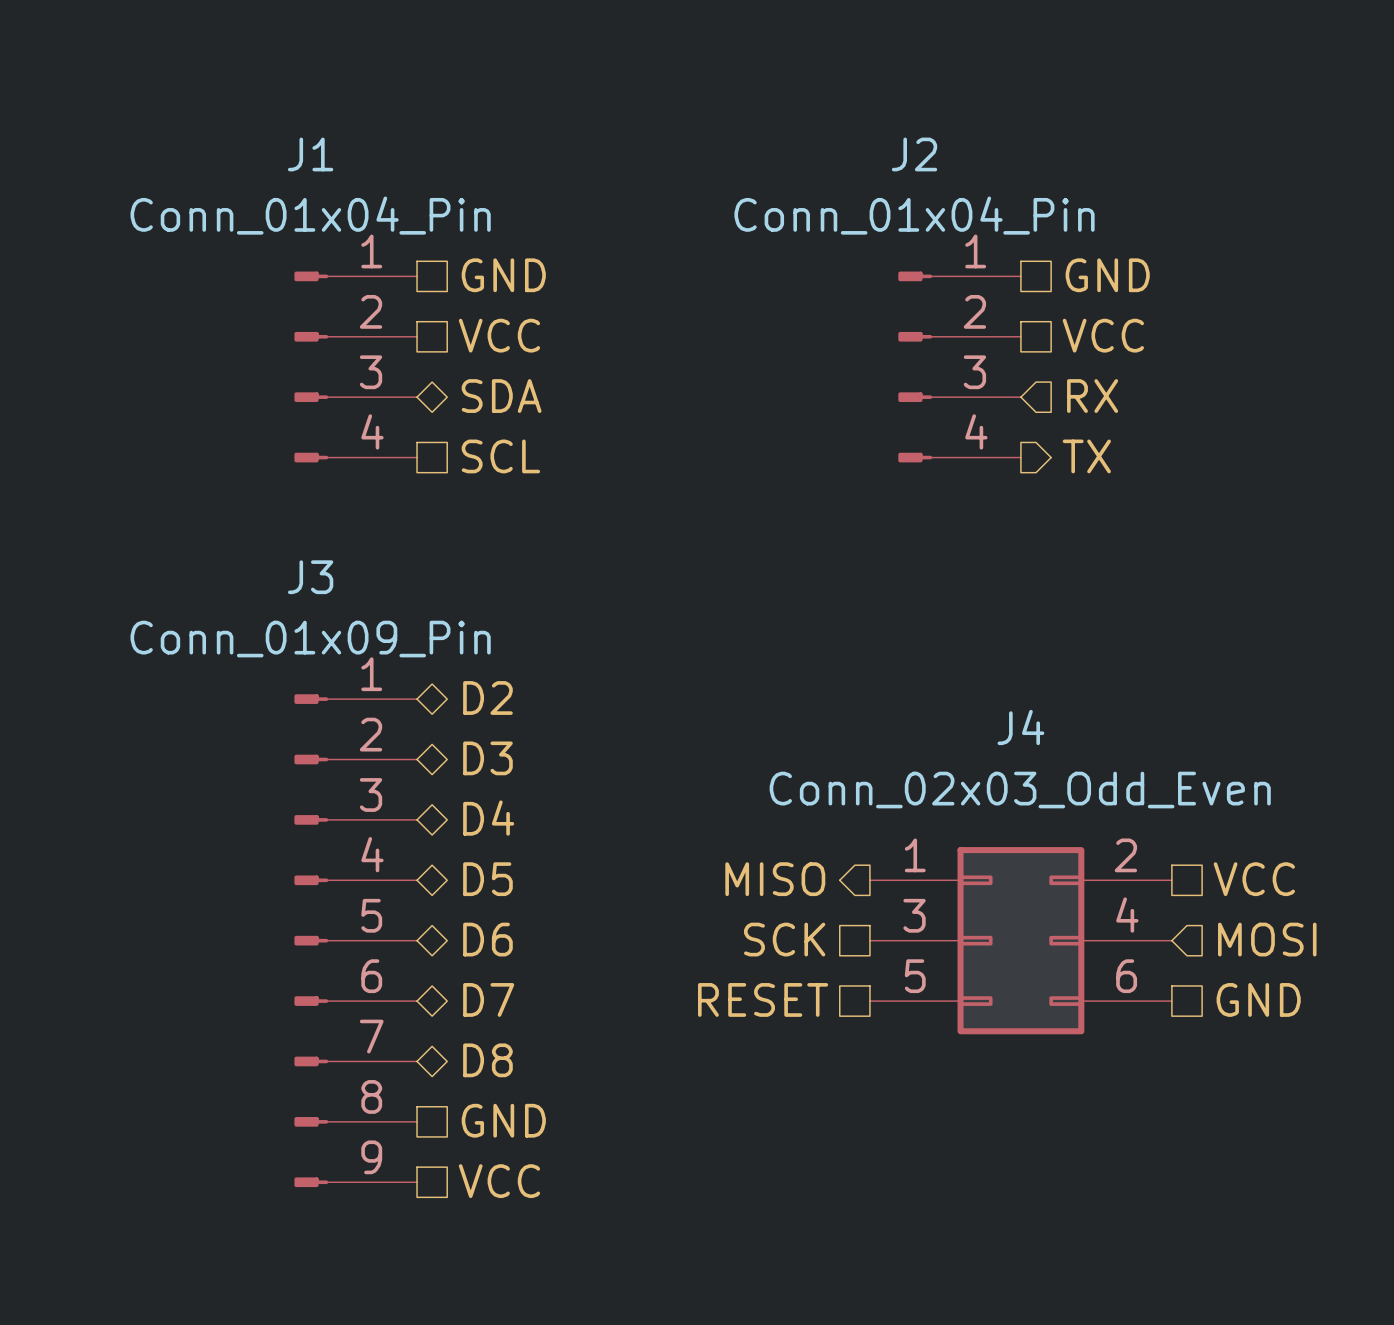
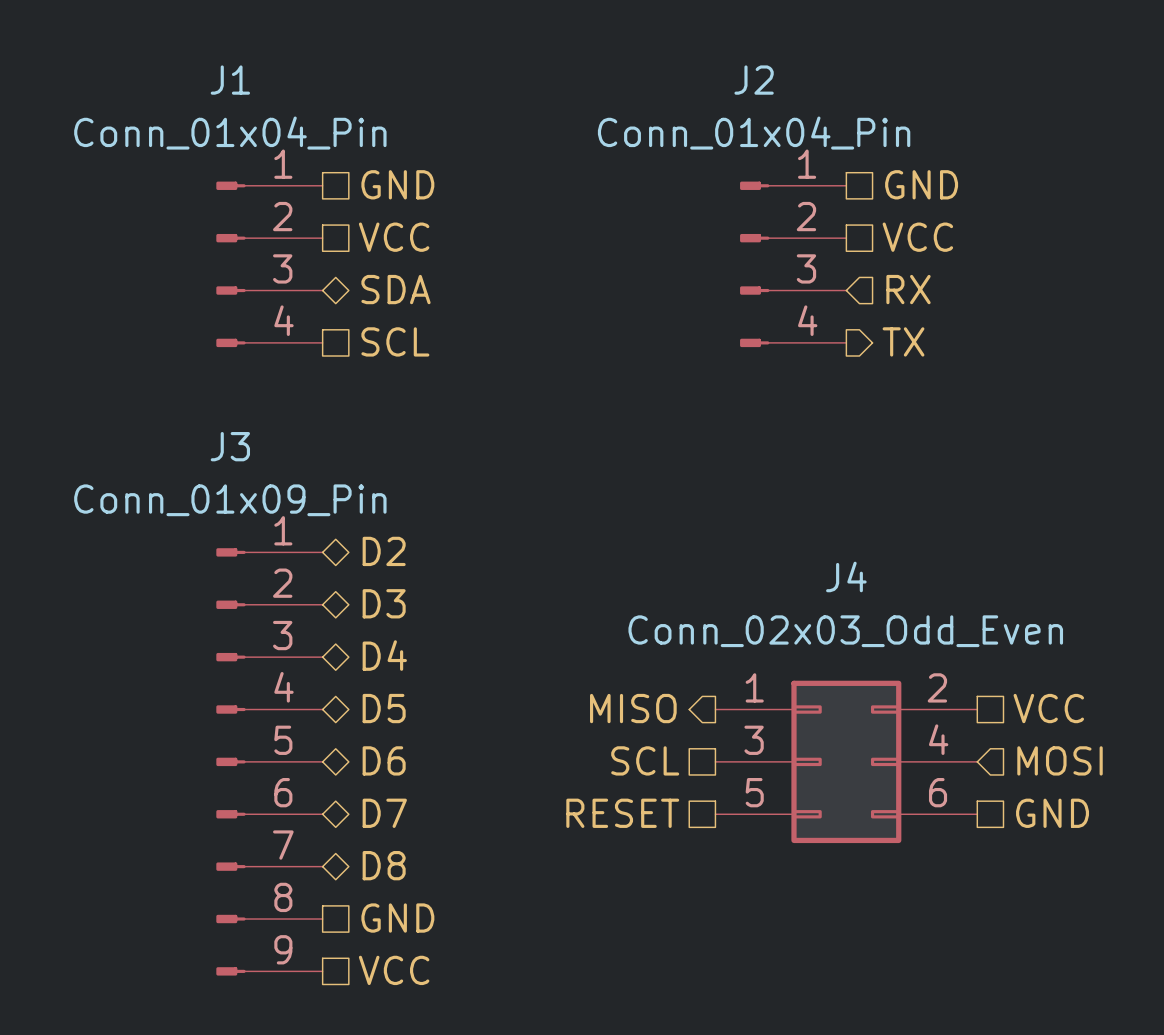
hierarchical label: SCK (784, 939) -> SCL (645, 760)

